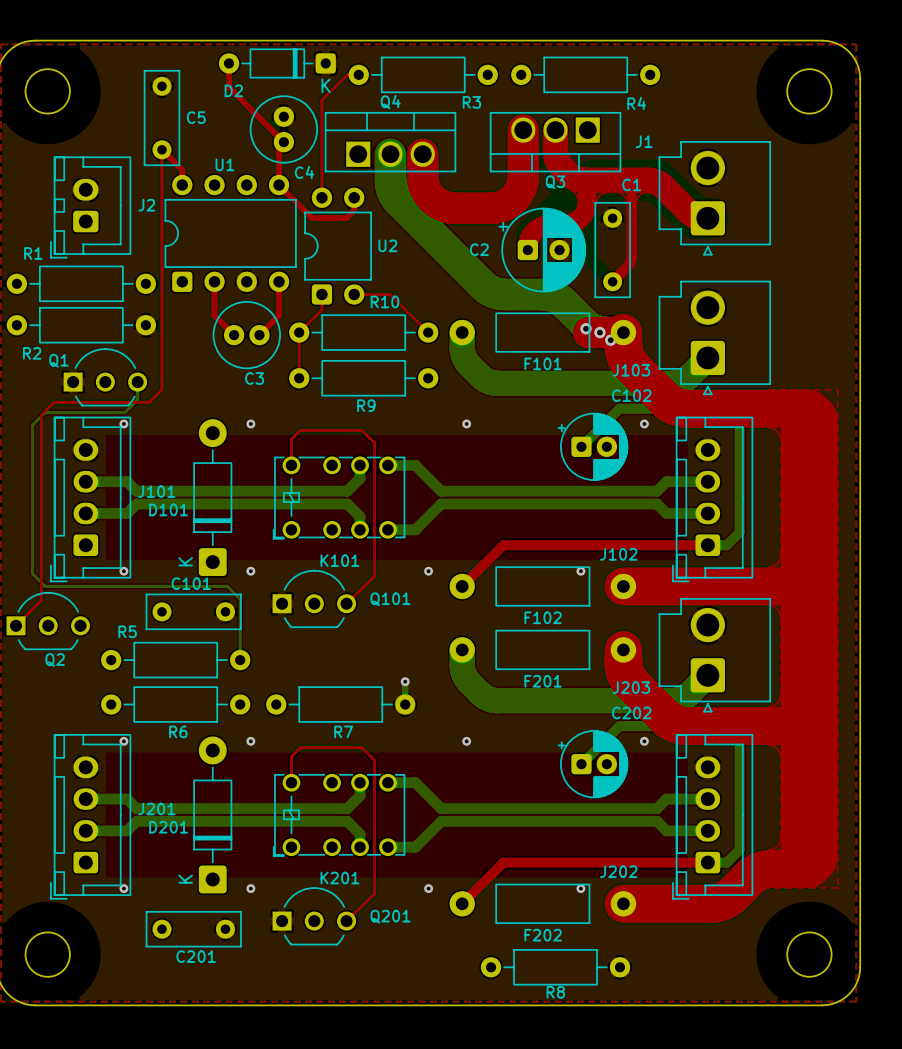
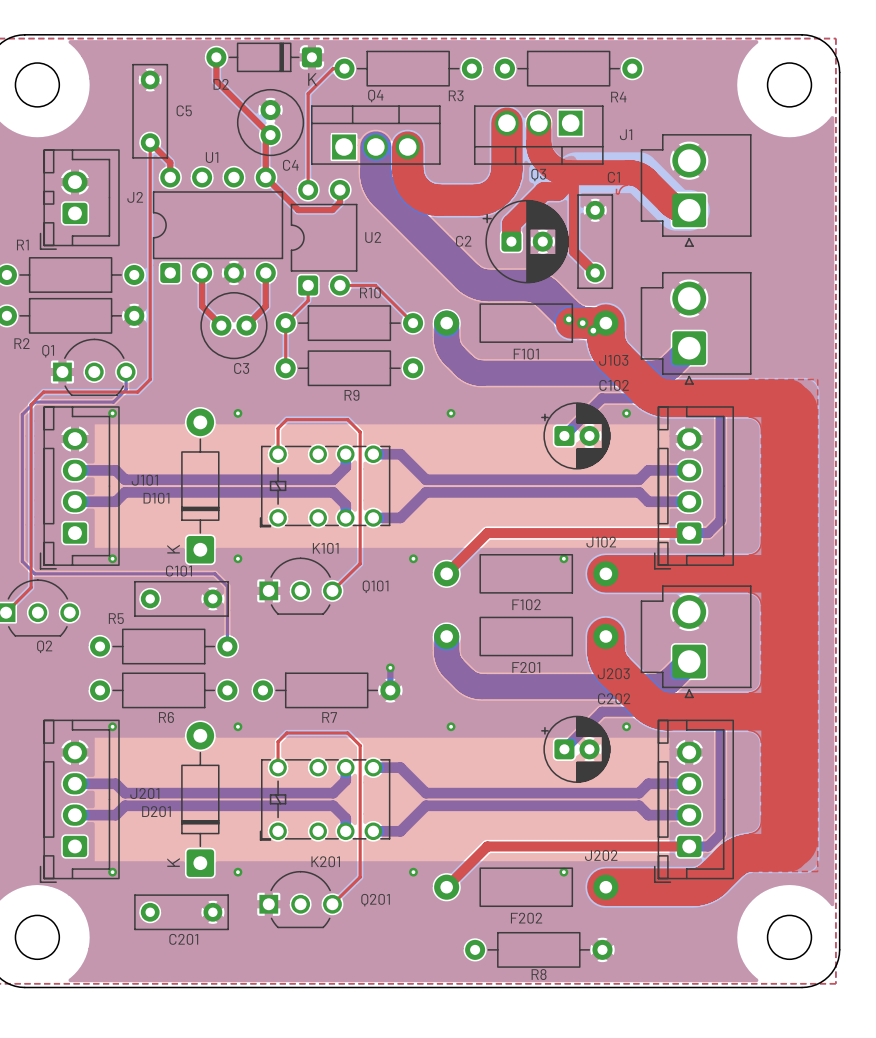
top track: (587, 180) (586, 206) (580, 218) (569, 224) (545, 225) (537, 228) (531, 234) (527, 246) -> (595, 272) (573, 251) (573, 175) (576, 172) (557, 191) (543, 191) (511, 223) (511, 238)
top track: (631, 180) (631, 258) (627, 266) (612, 281) -> none
top zone outline: (594, 186) (606, 186) (606, 192) (599, 195) (596, 203) (594, 203) (594, 186) -> none
top zone outline: (617, 186) (629, 186) (629, 201) (626, 201) (623, 194) (617, 192) (617, 186) -> none

